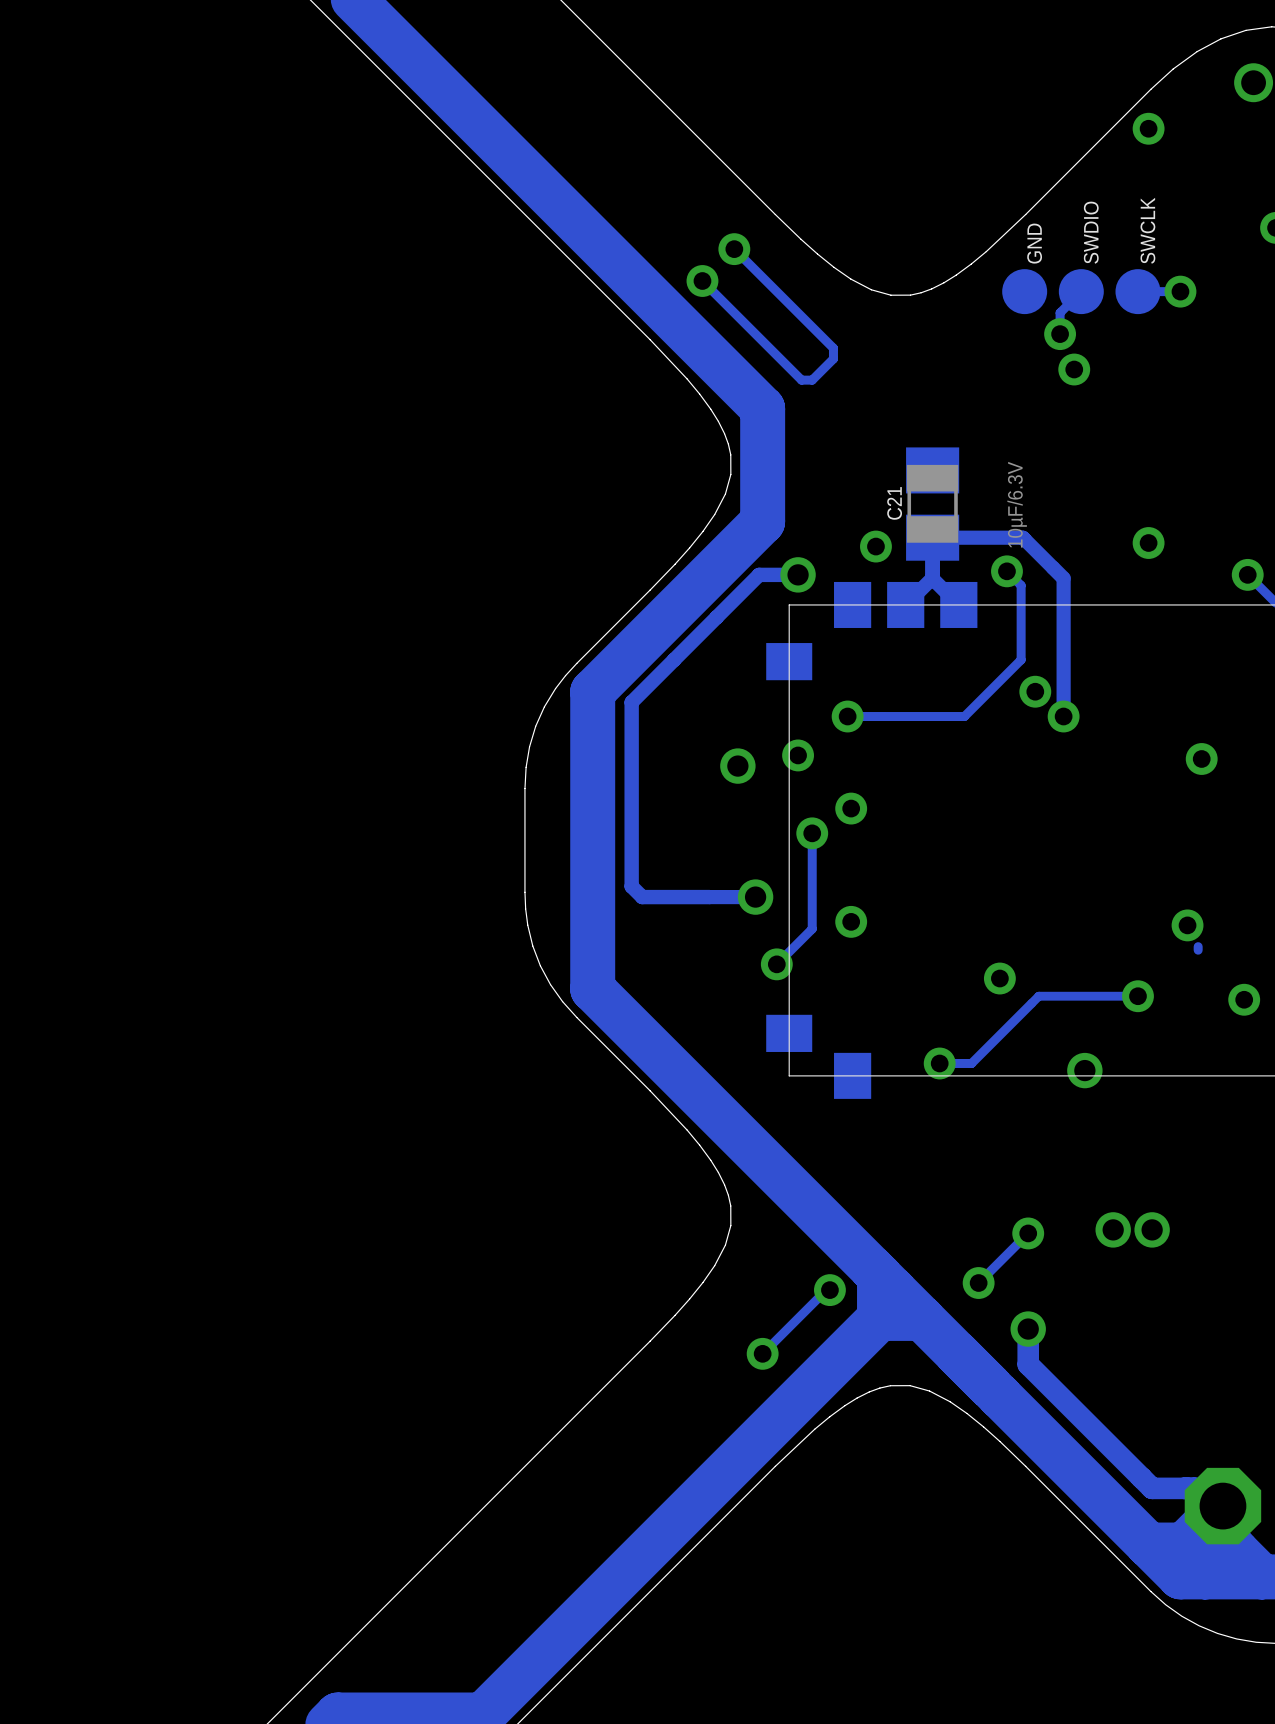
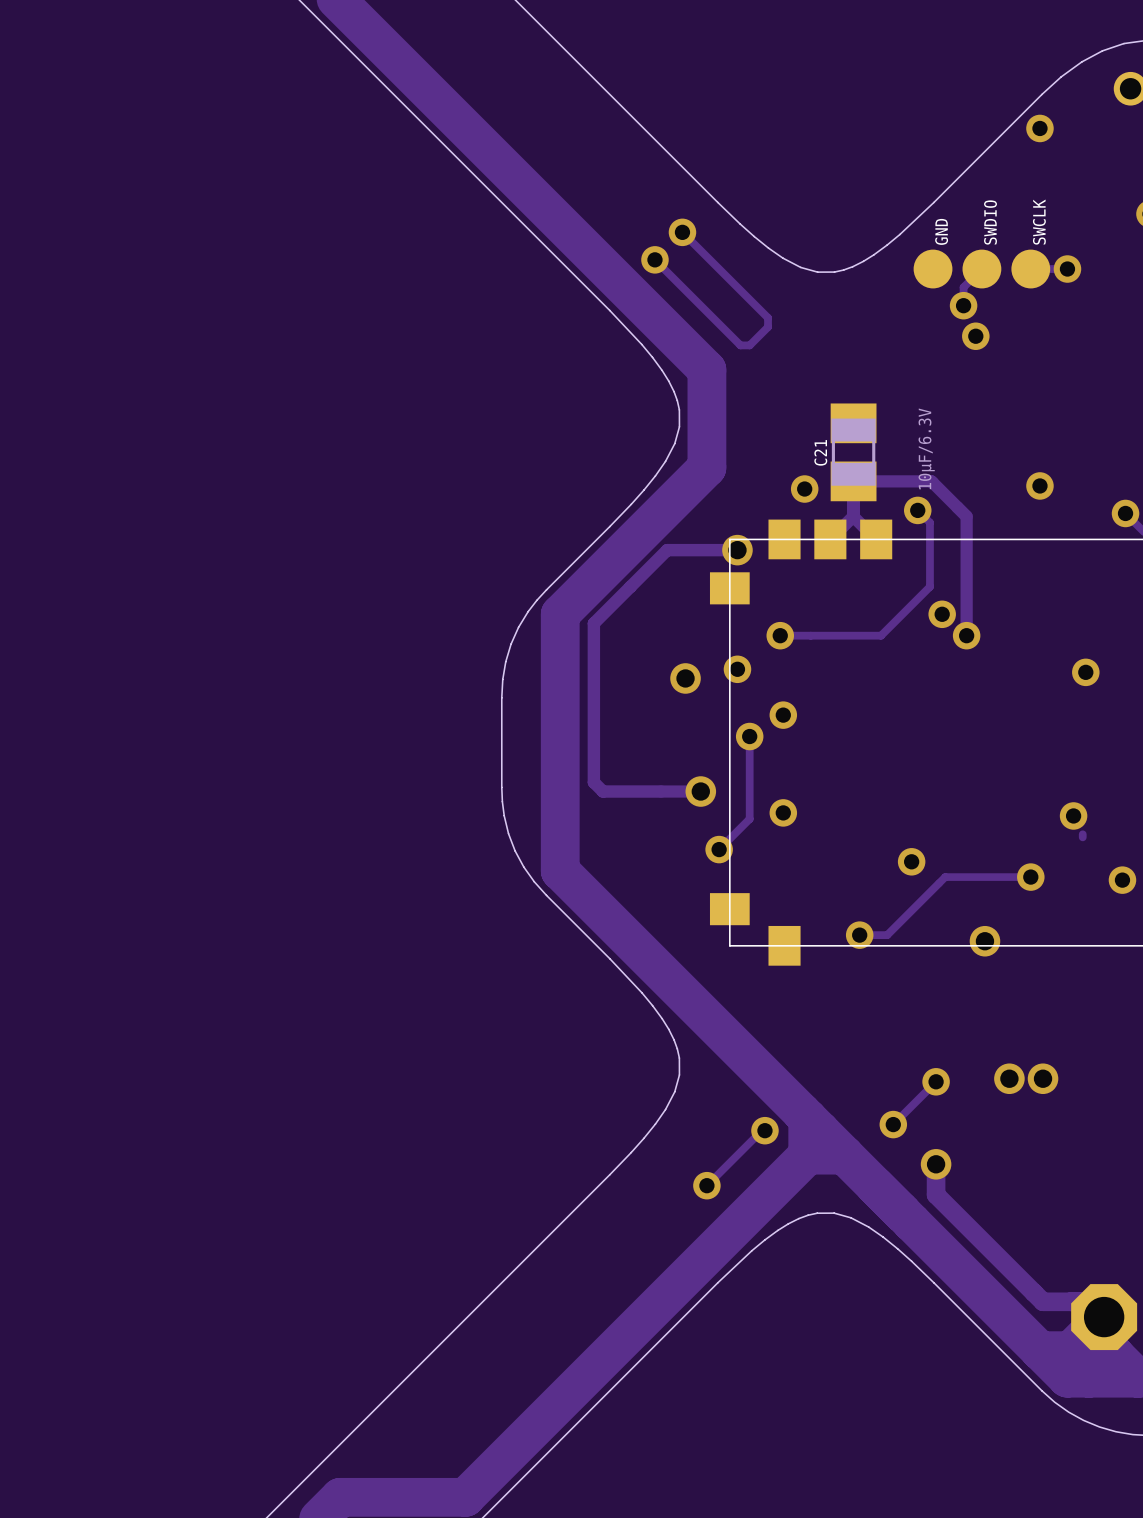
track: (798, 574) (759, 574) (716, 617) -> (737, 550) (667, 550)
via position: (798, 574) -> (737, 550)

